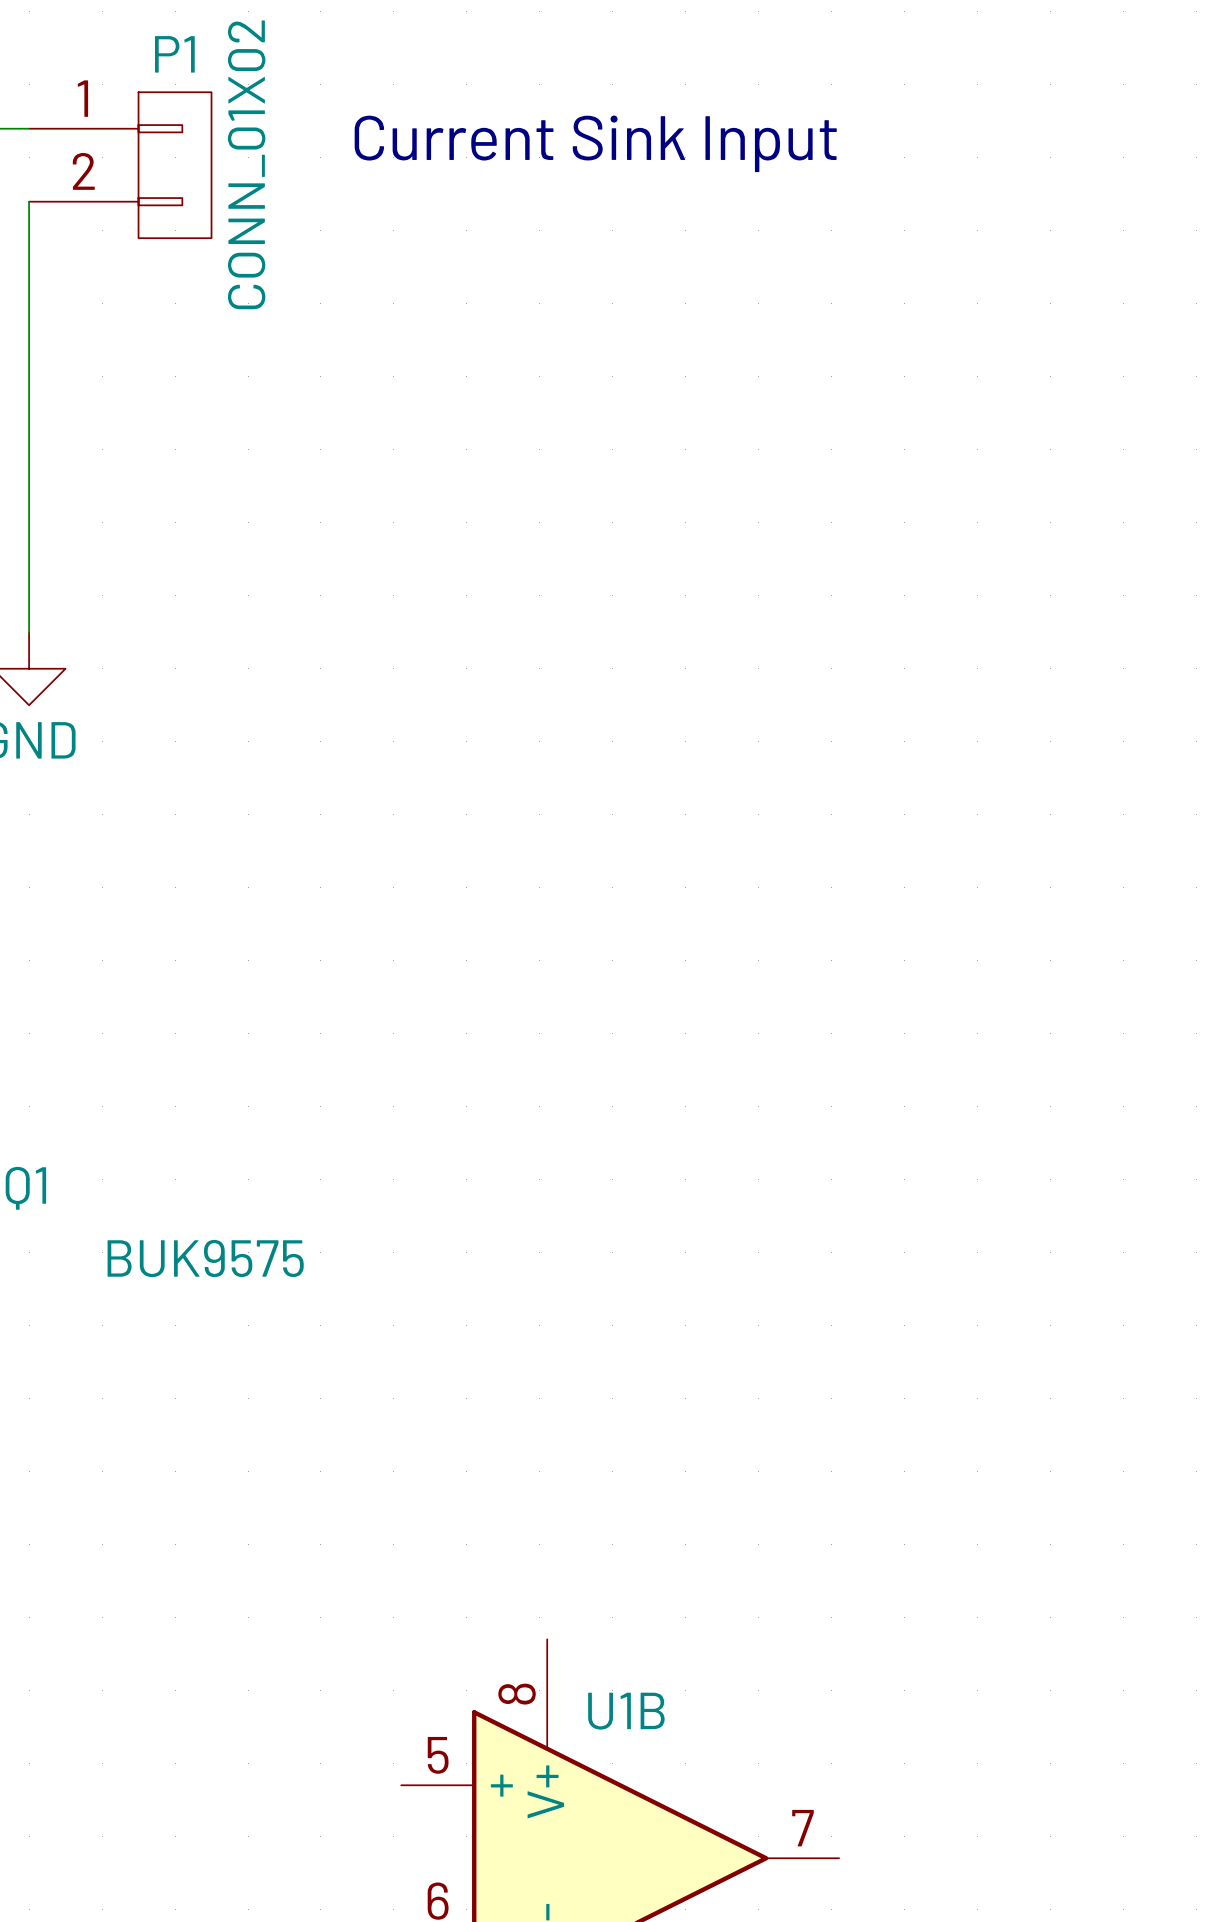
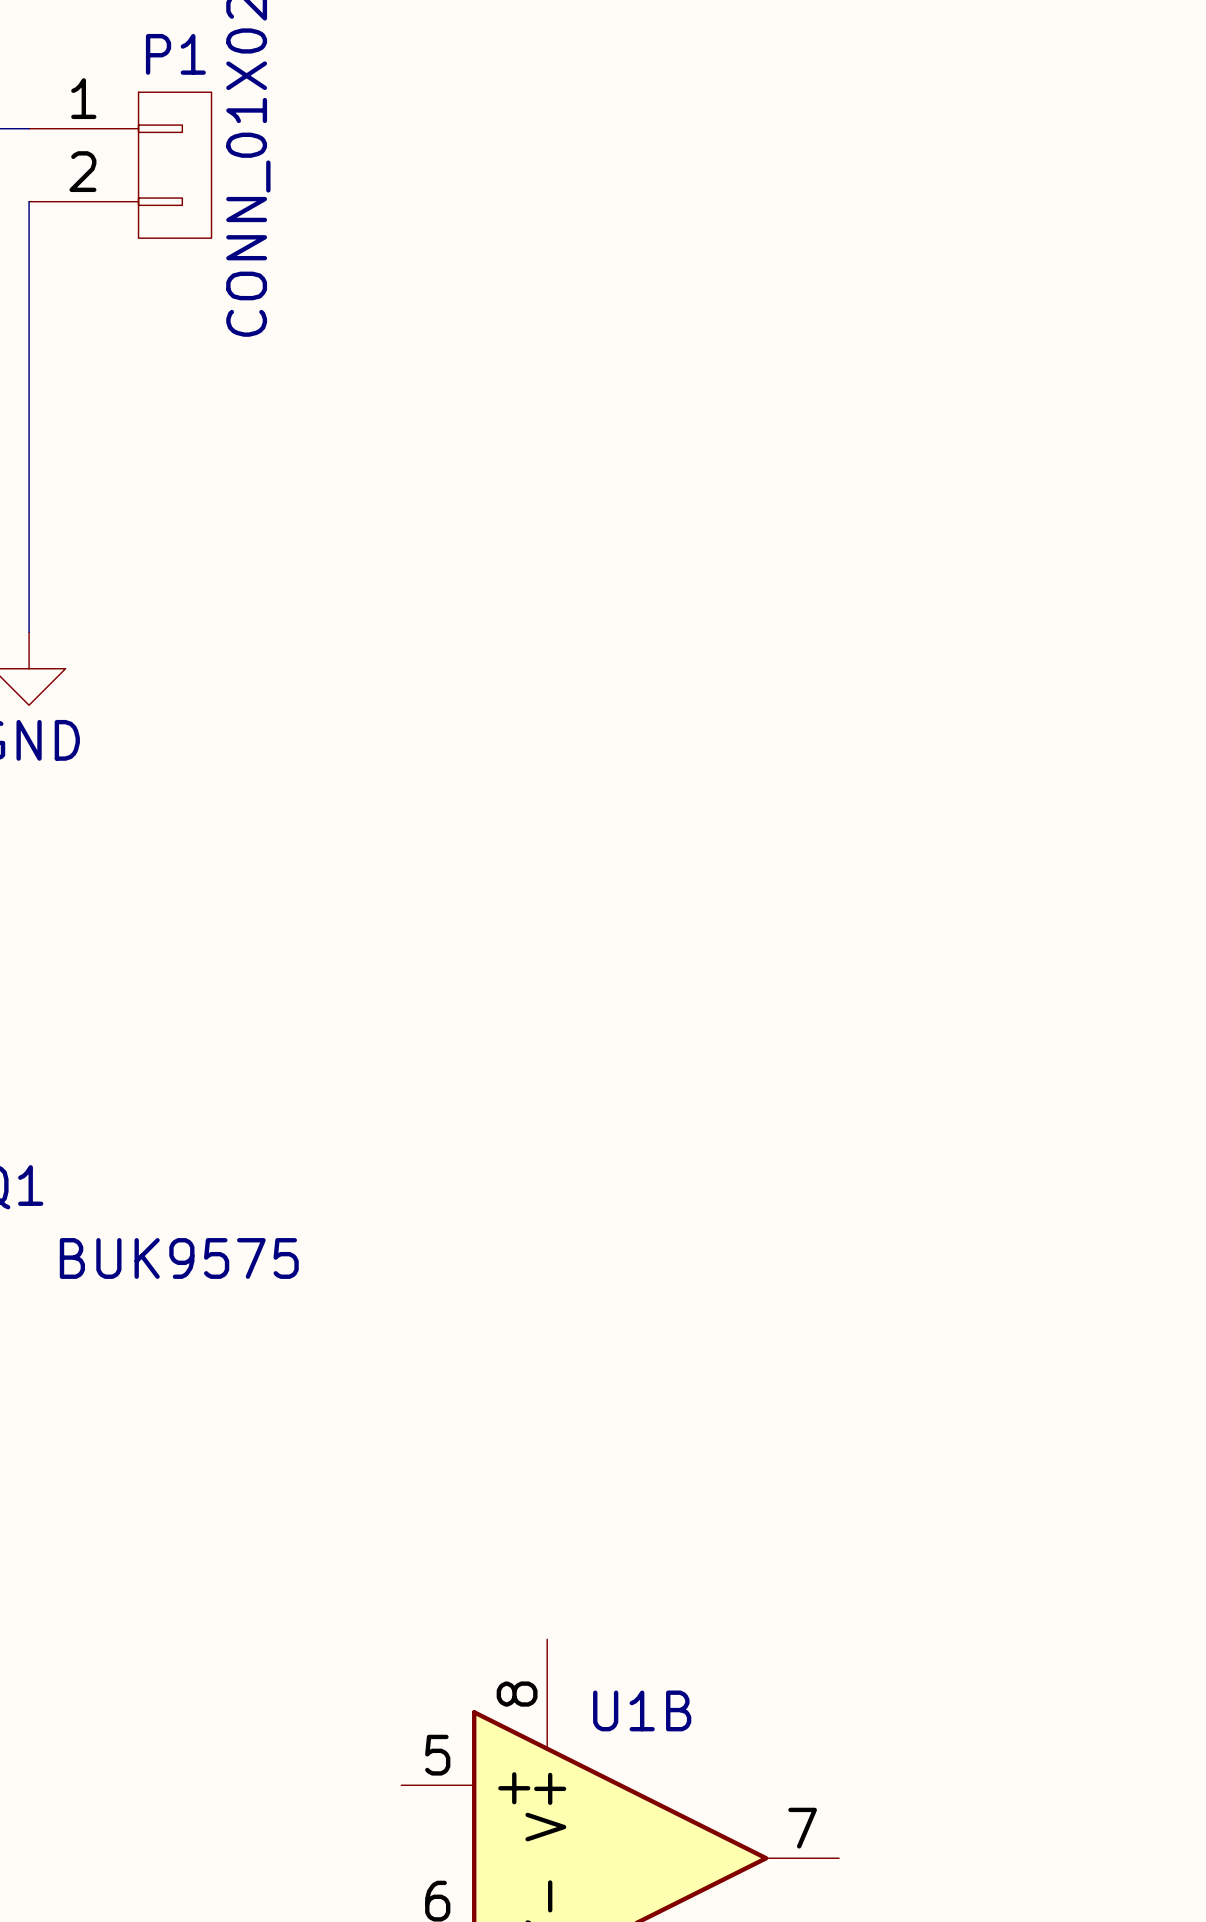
text: Current Sink Input (595, 143) -> none

